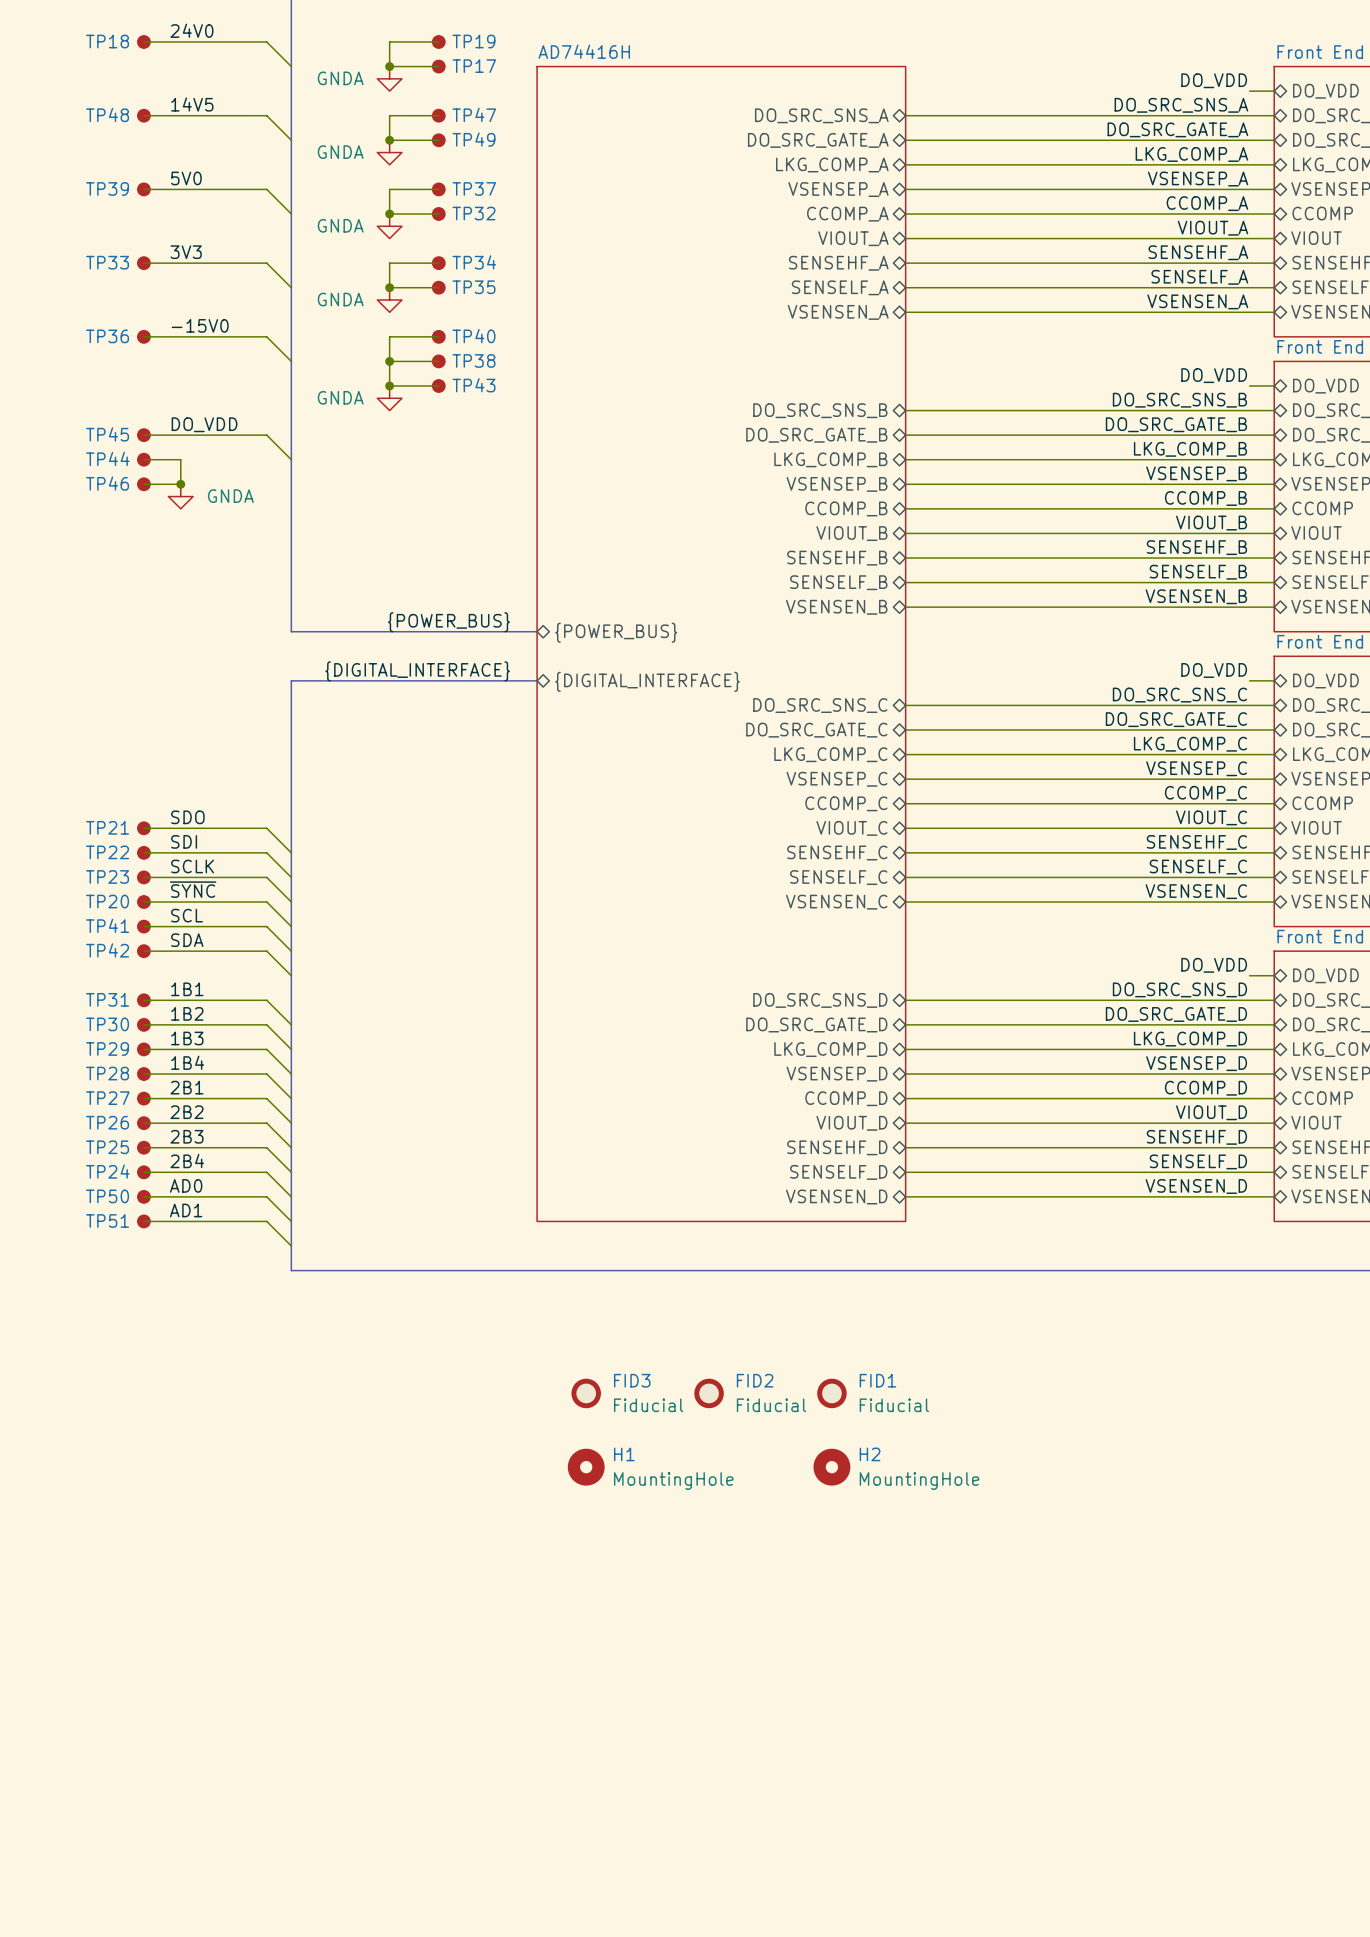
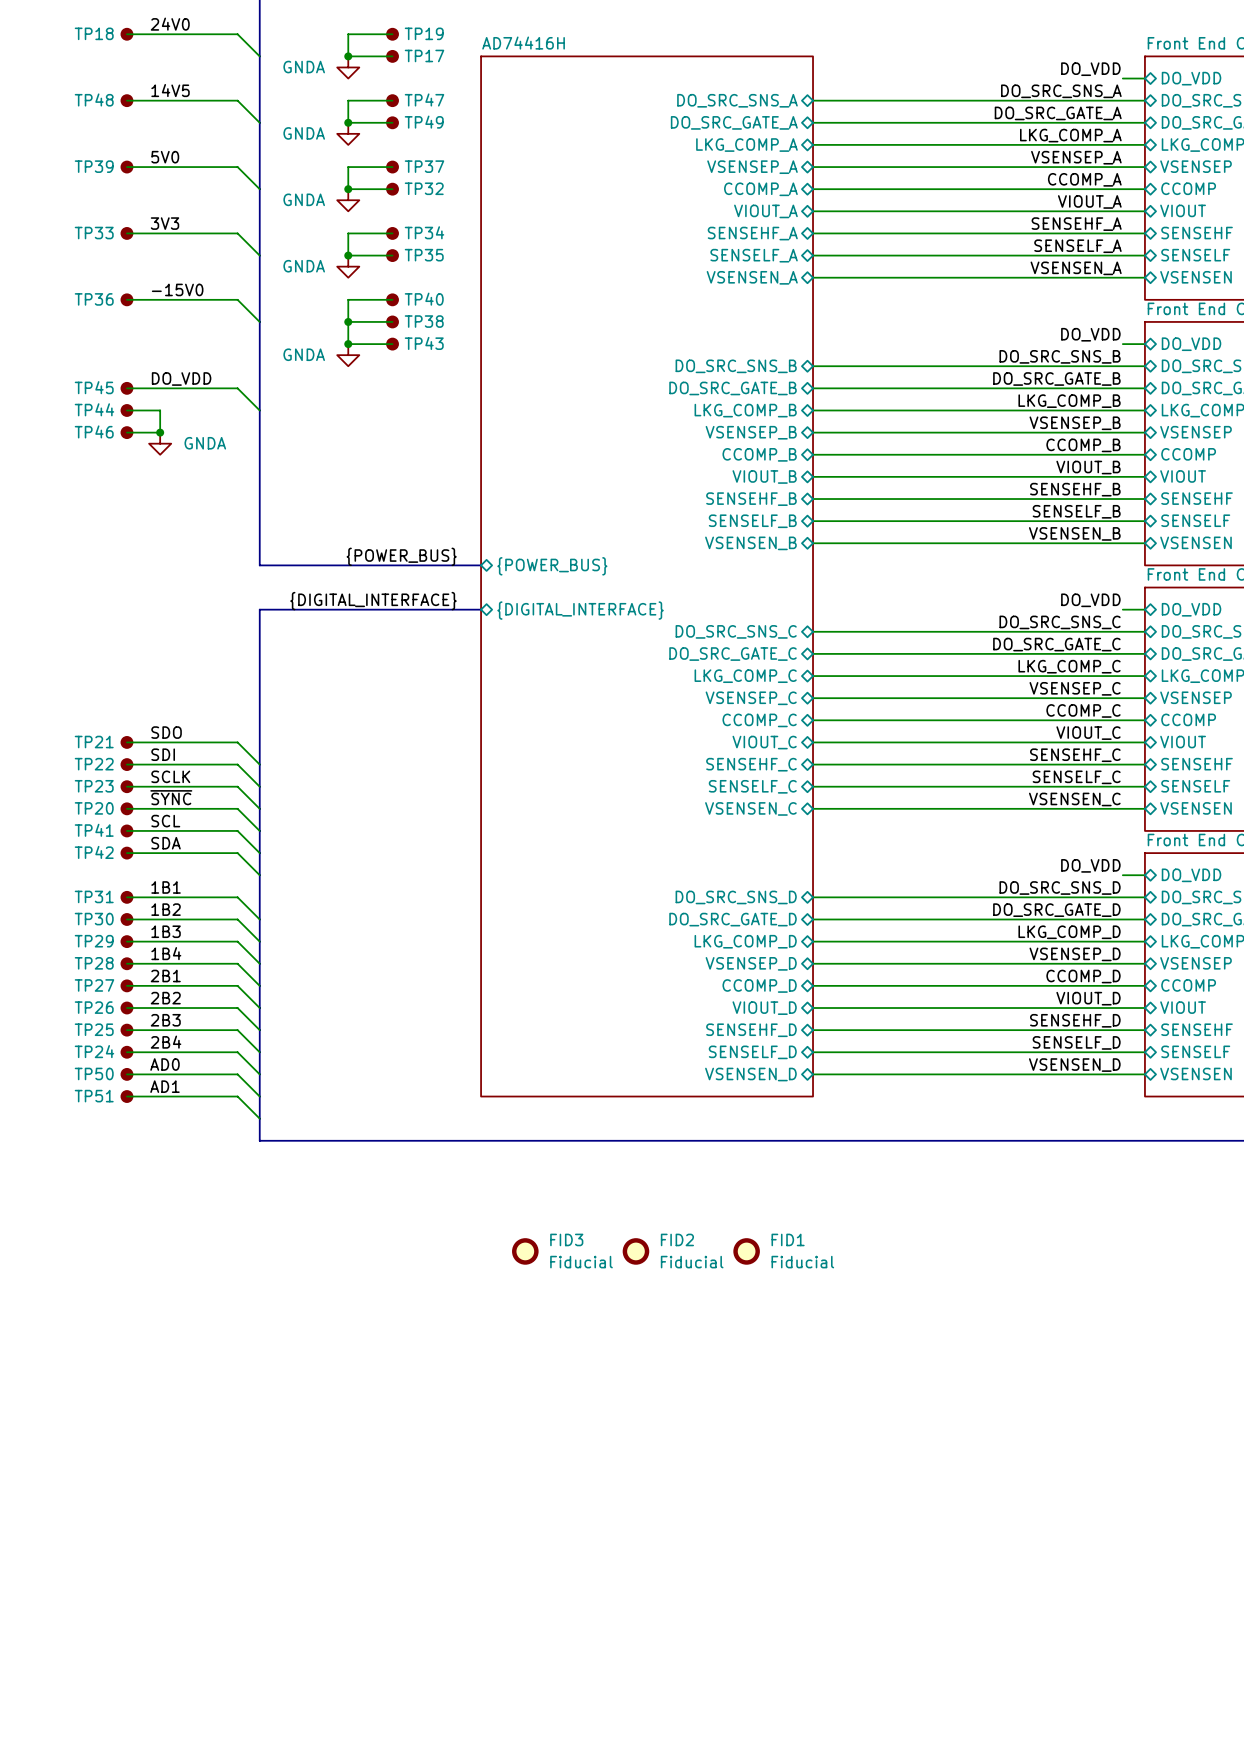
H1: MountingHole (586, 1467) -> none
H2: MountingHole (831, 1467) -> none

